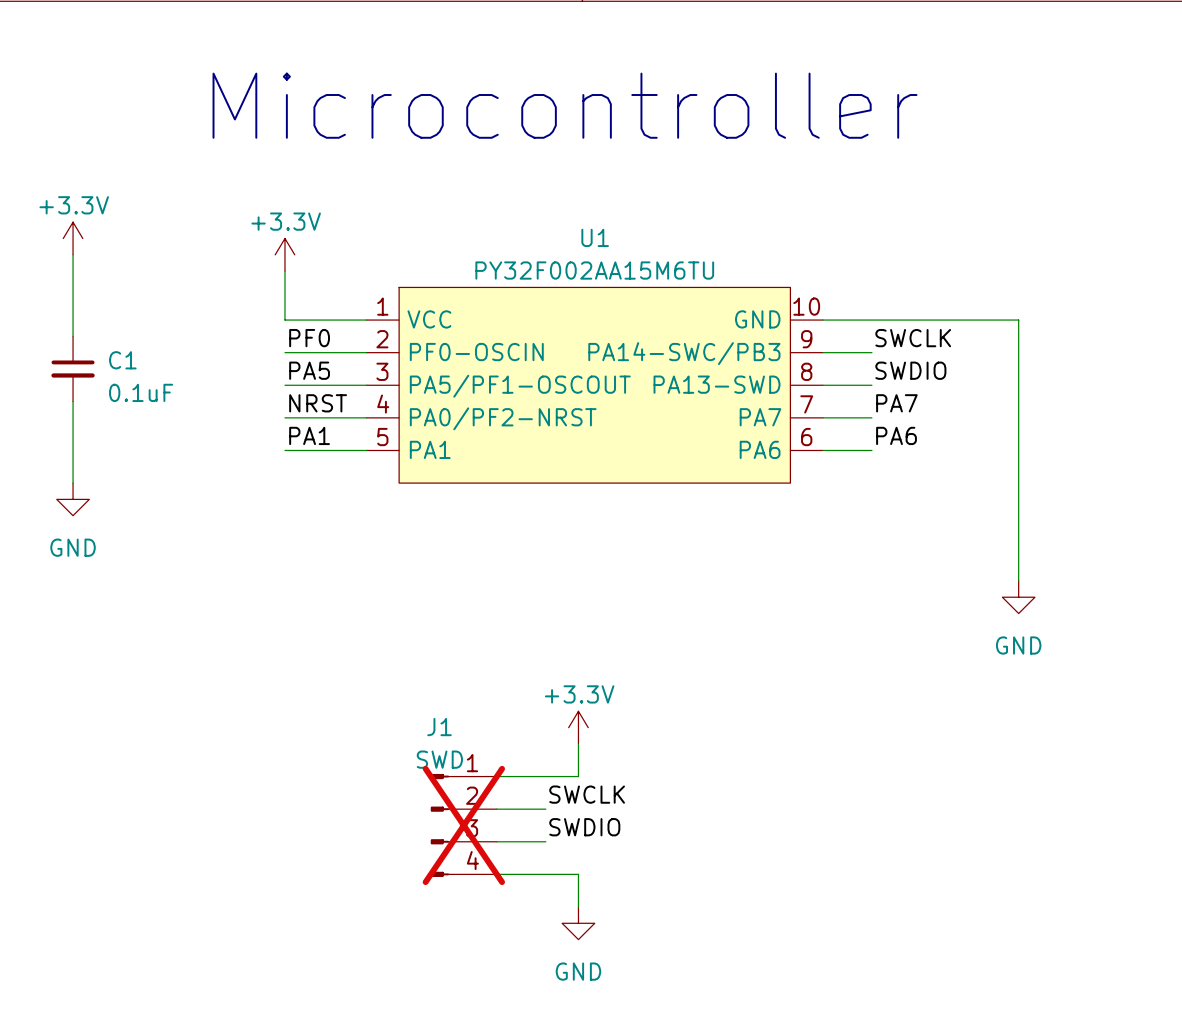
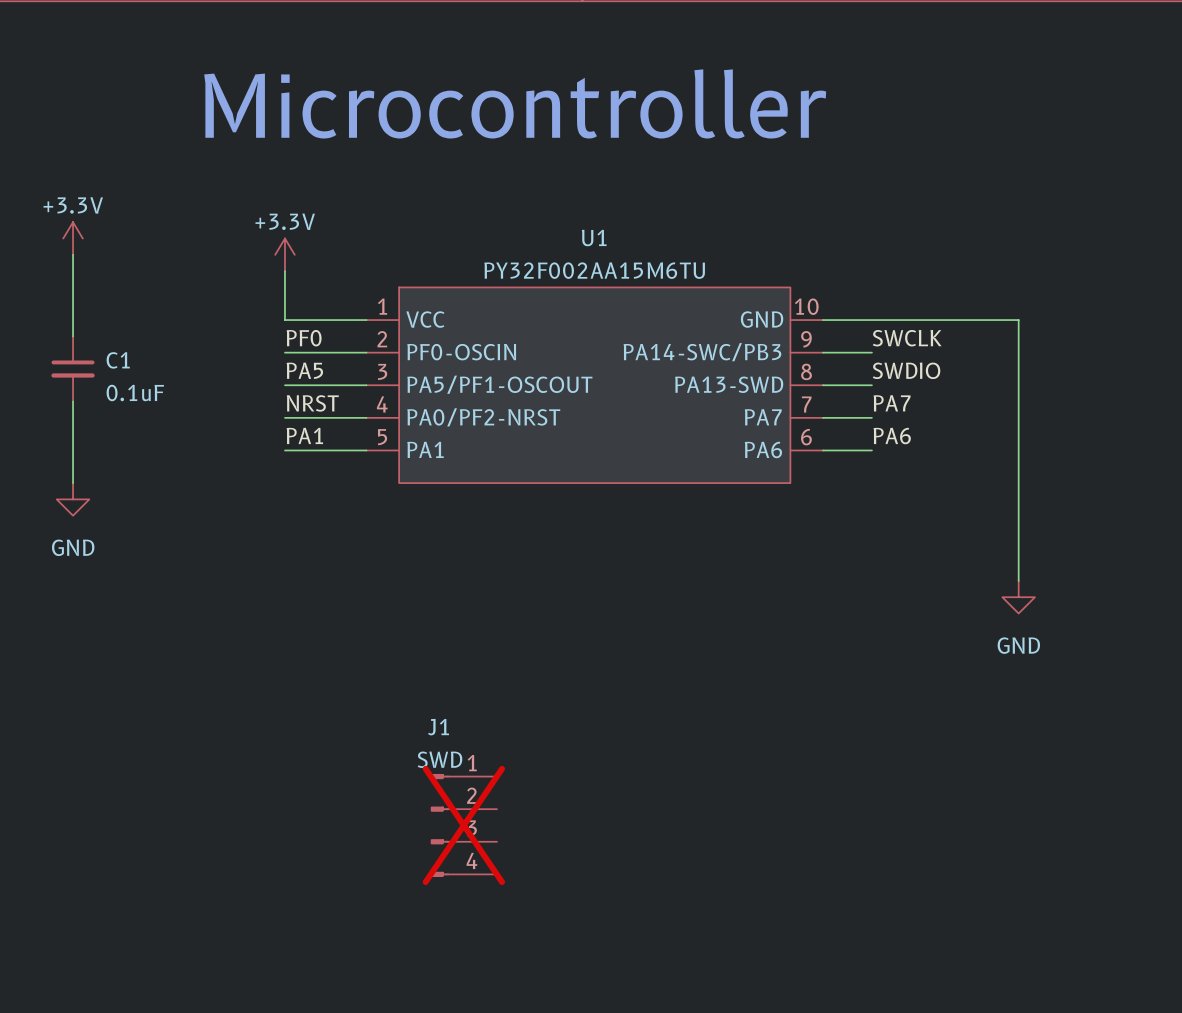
power symbol: +3.3V (578, 727) -> none
wire: (578, 743) (578, 776) (496, 776) -> none
label: SWCLK (587, 794) -> none
wire: (496, 809) (545, 809) -> none
label: SWDIO (584, 827) -> none
wire: (496, 841) (545, 841) -> none
wire: (496, 874) (578, 874) (578, 906) -> none
power symbol: GND (578, 923) -> none

